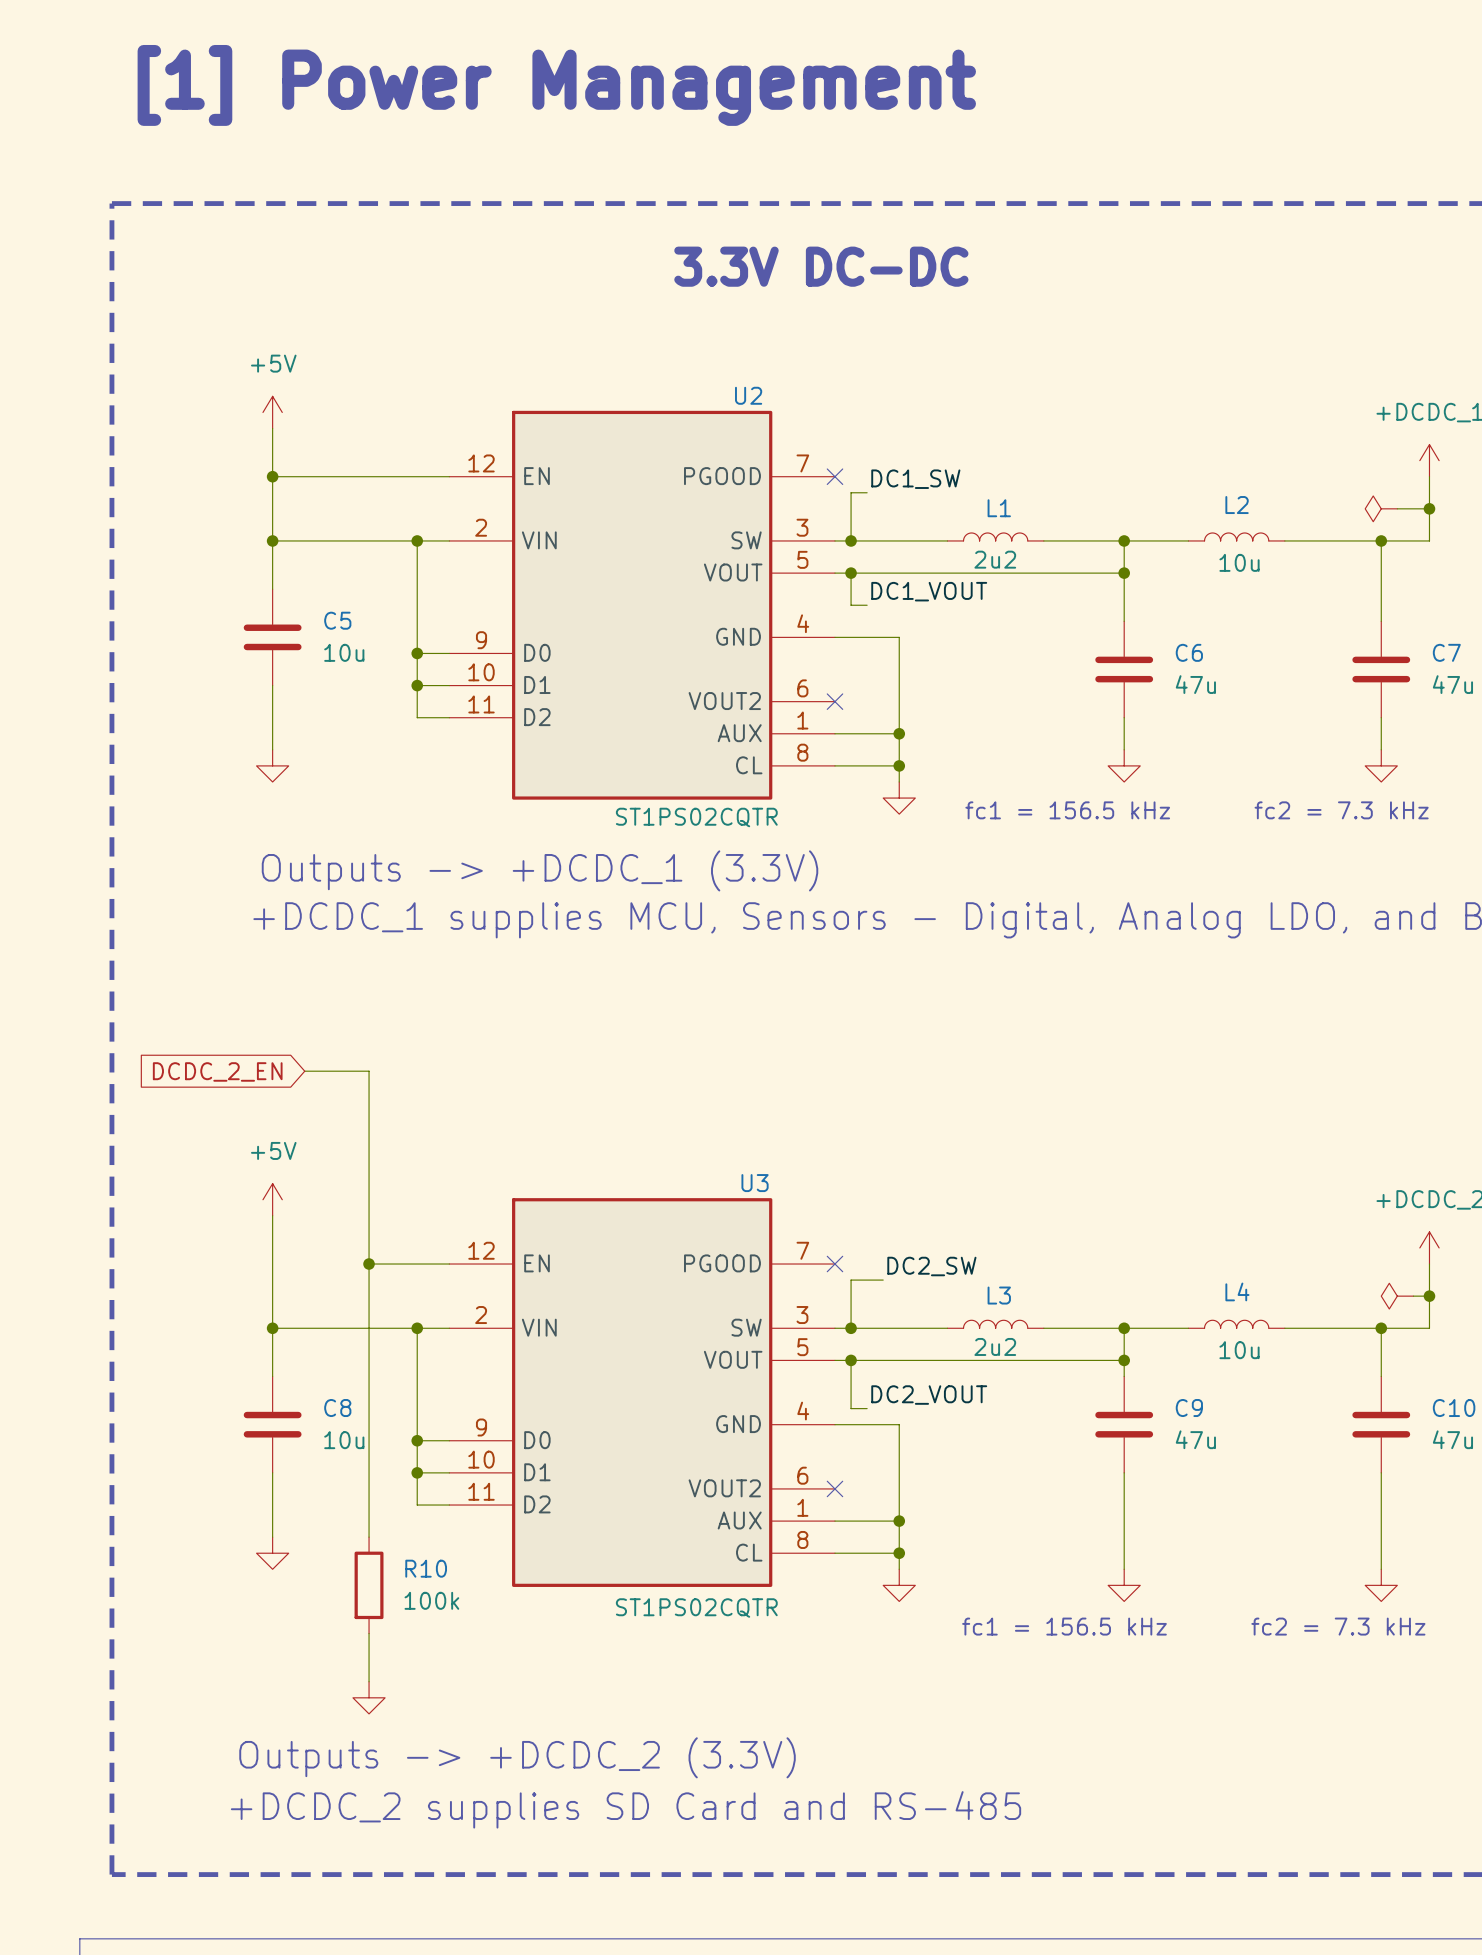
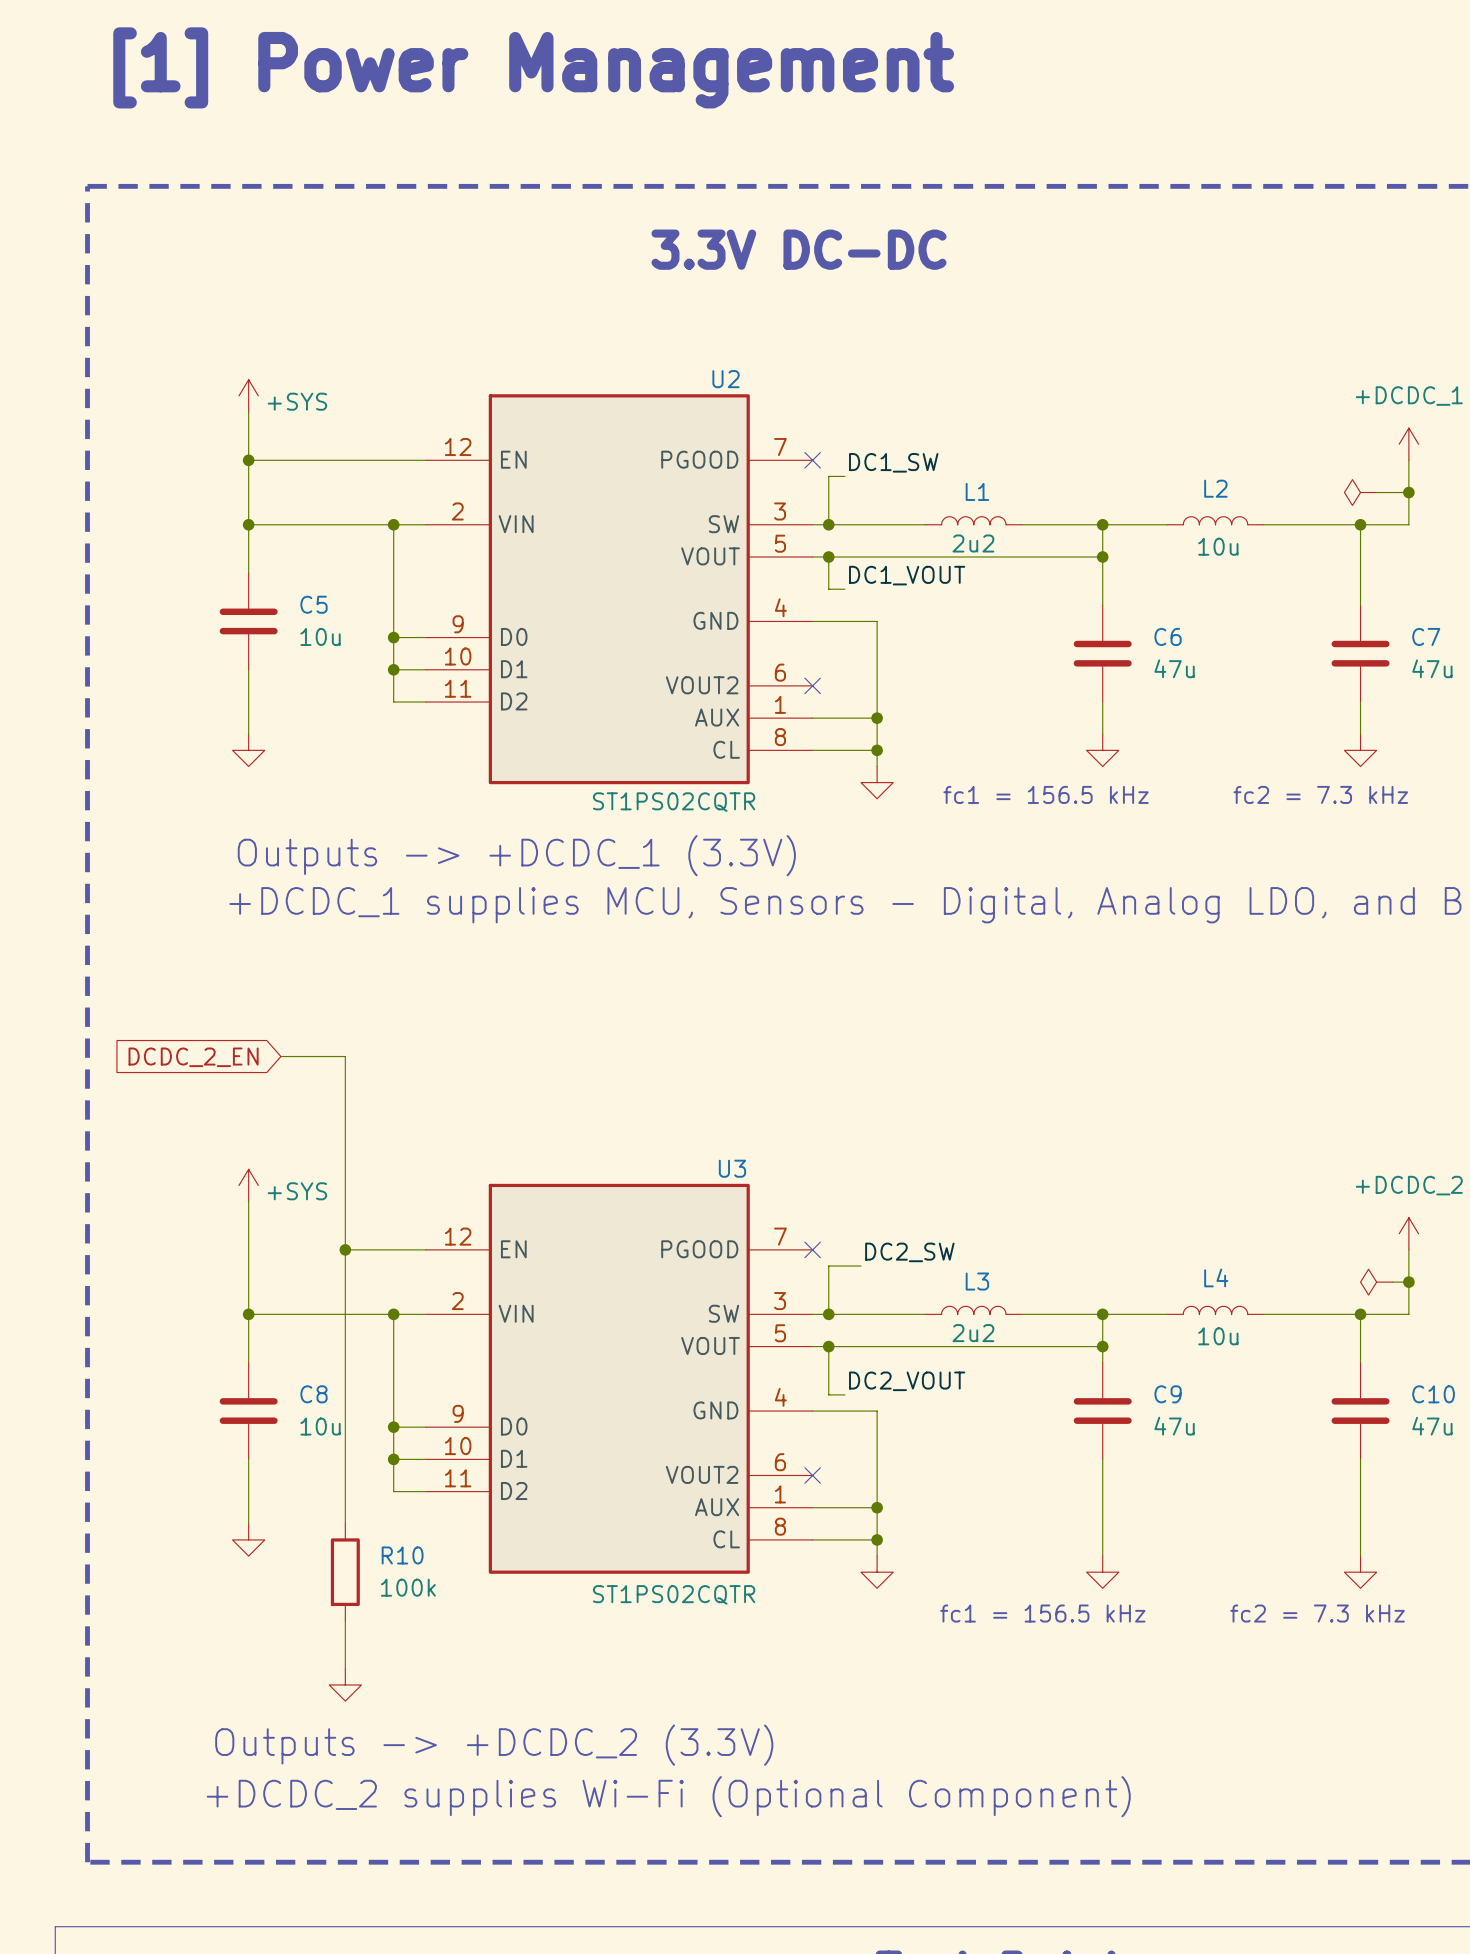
power symbol: +5V (272, 412) -> +SYS (248, 395)
power symbol: +5V (272, 1199) -> +SYS (248, 1185)
text: +DCDC_2 supplies SD Card and RS-485 (626, 1809) -> +DCDC_2 supplies Wi-Fi (Optional Component) (668, 1796)

